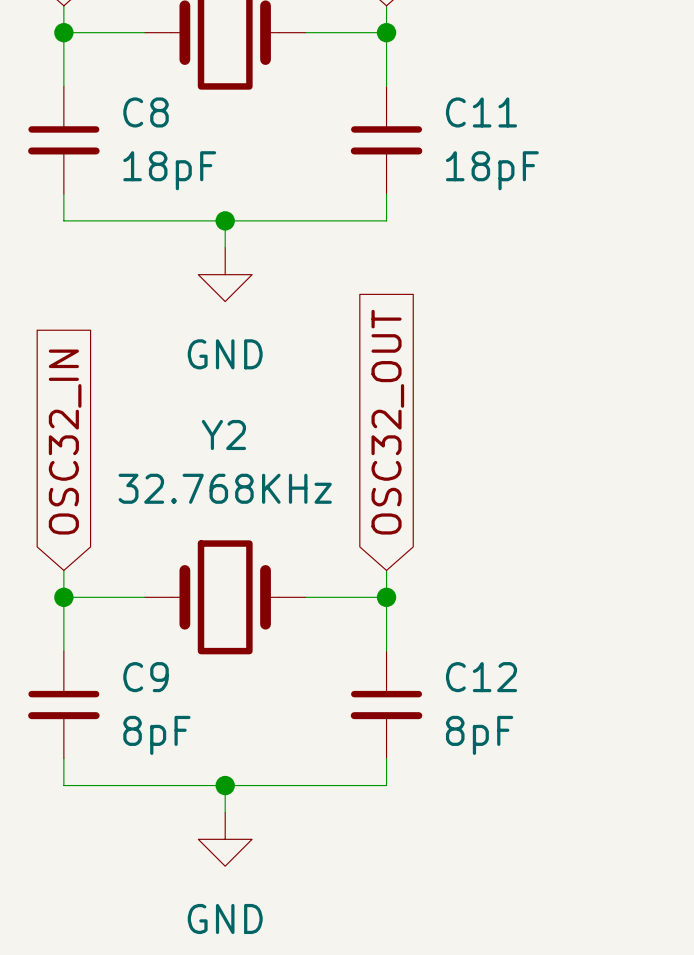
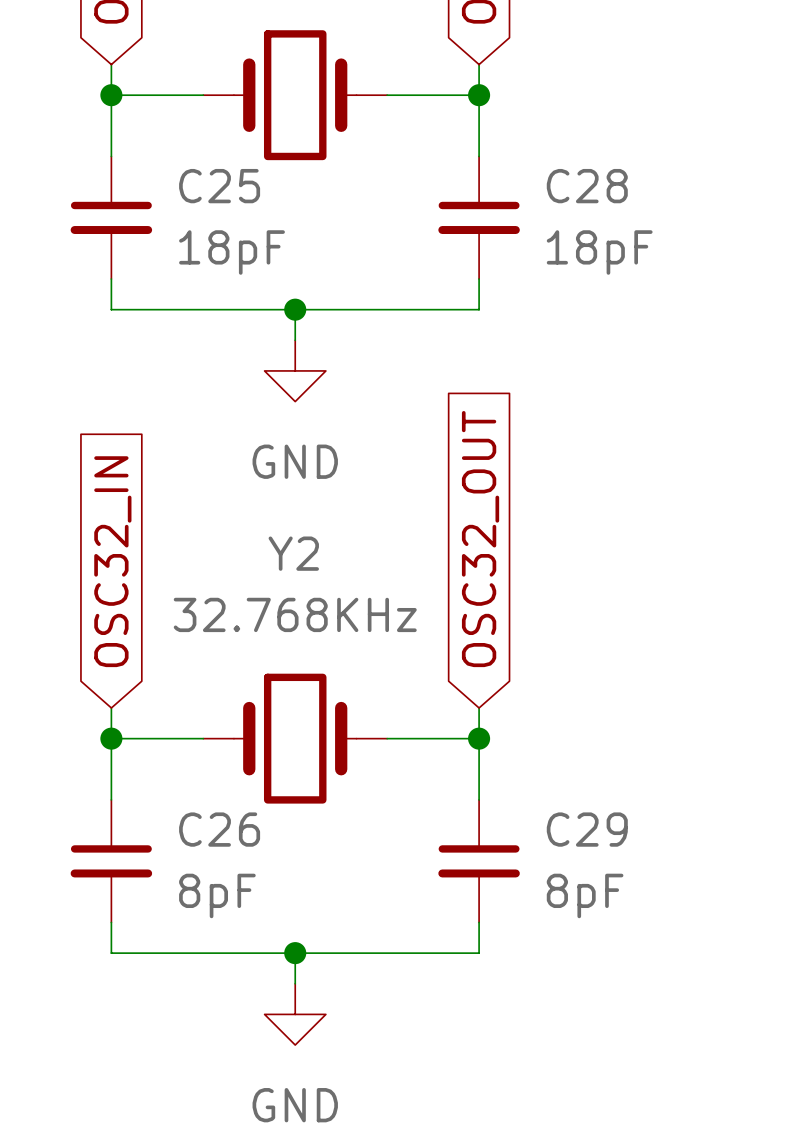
C8 name: C8 (146, 112) -> C25 (219, 186)
C11 name: C11 (481, 112) -> C28 (587, 186)
C9 name: C9 (146, 677) -> C26 (219, 829)
C12 name: C12 (481, 677) -> C29 (587, 829)

